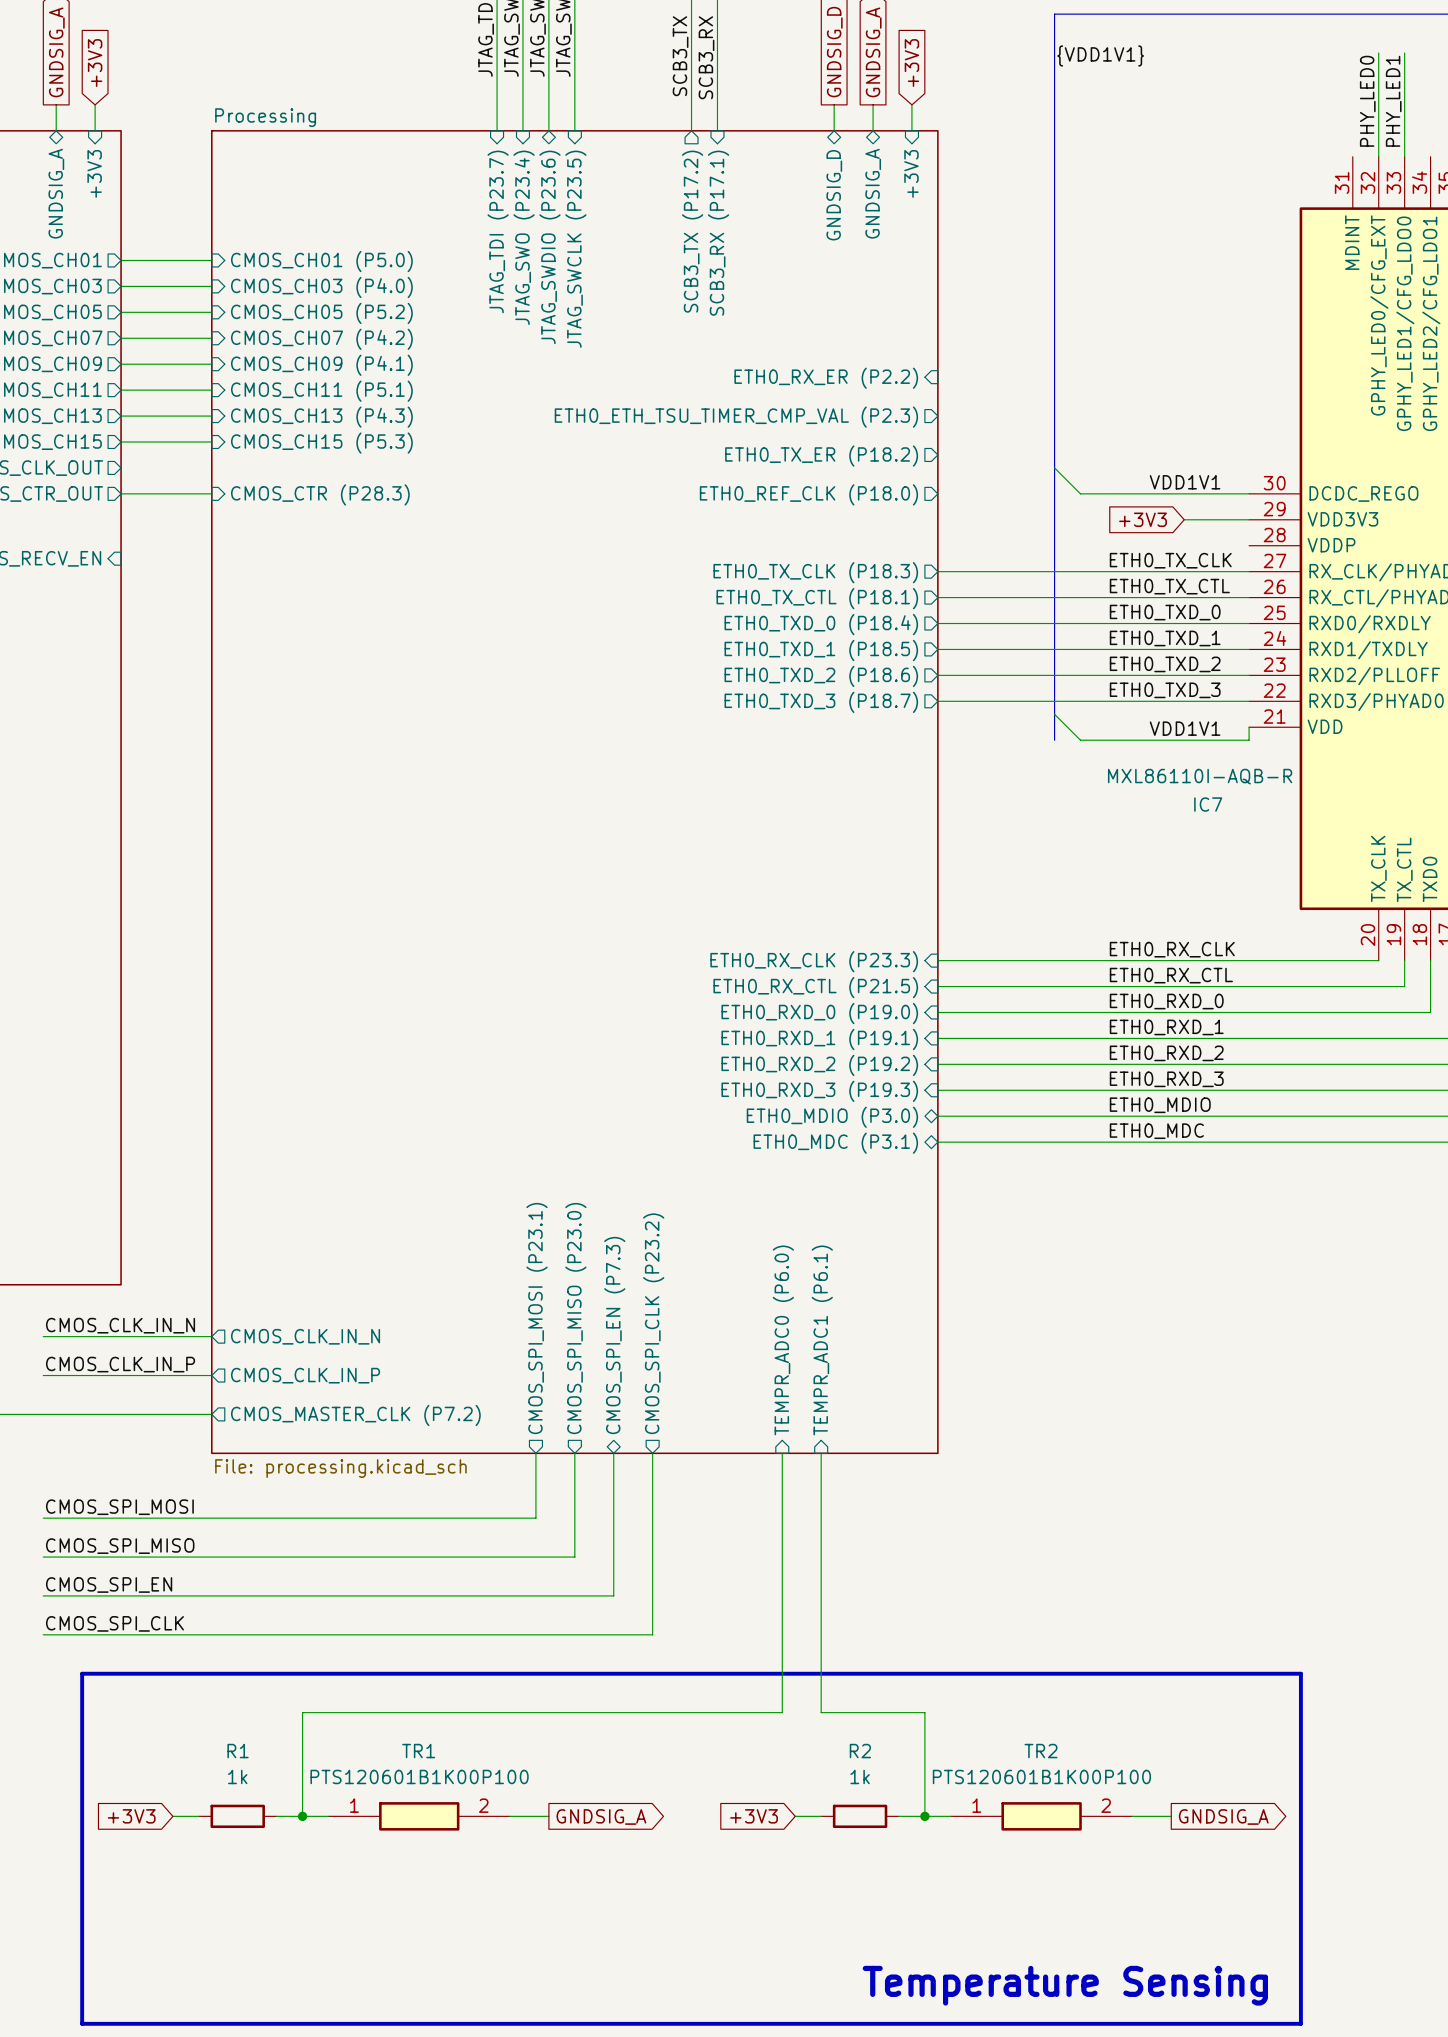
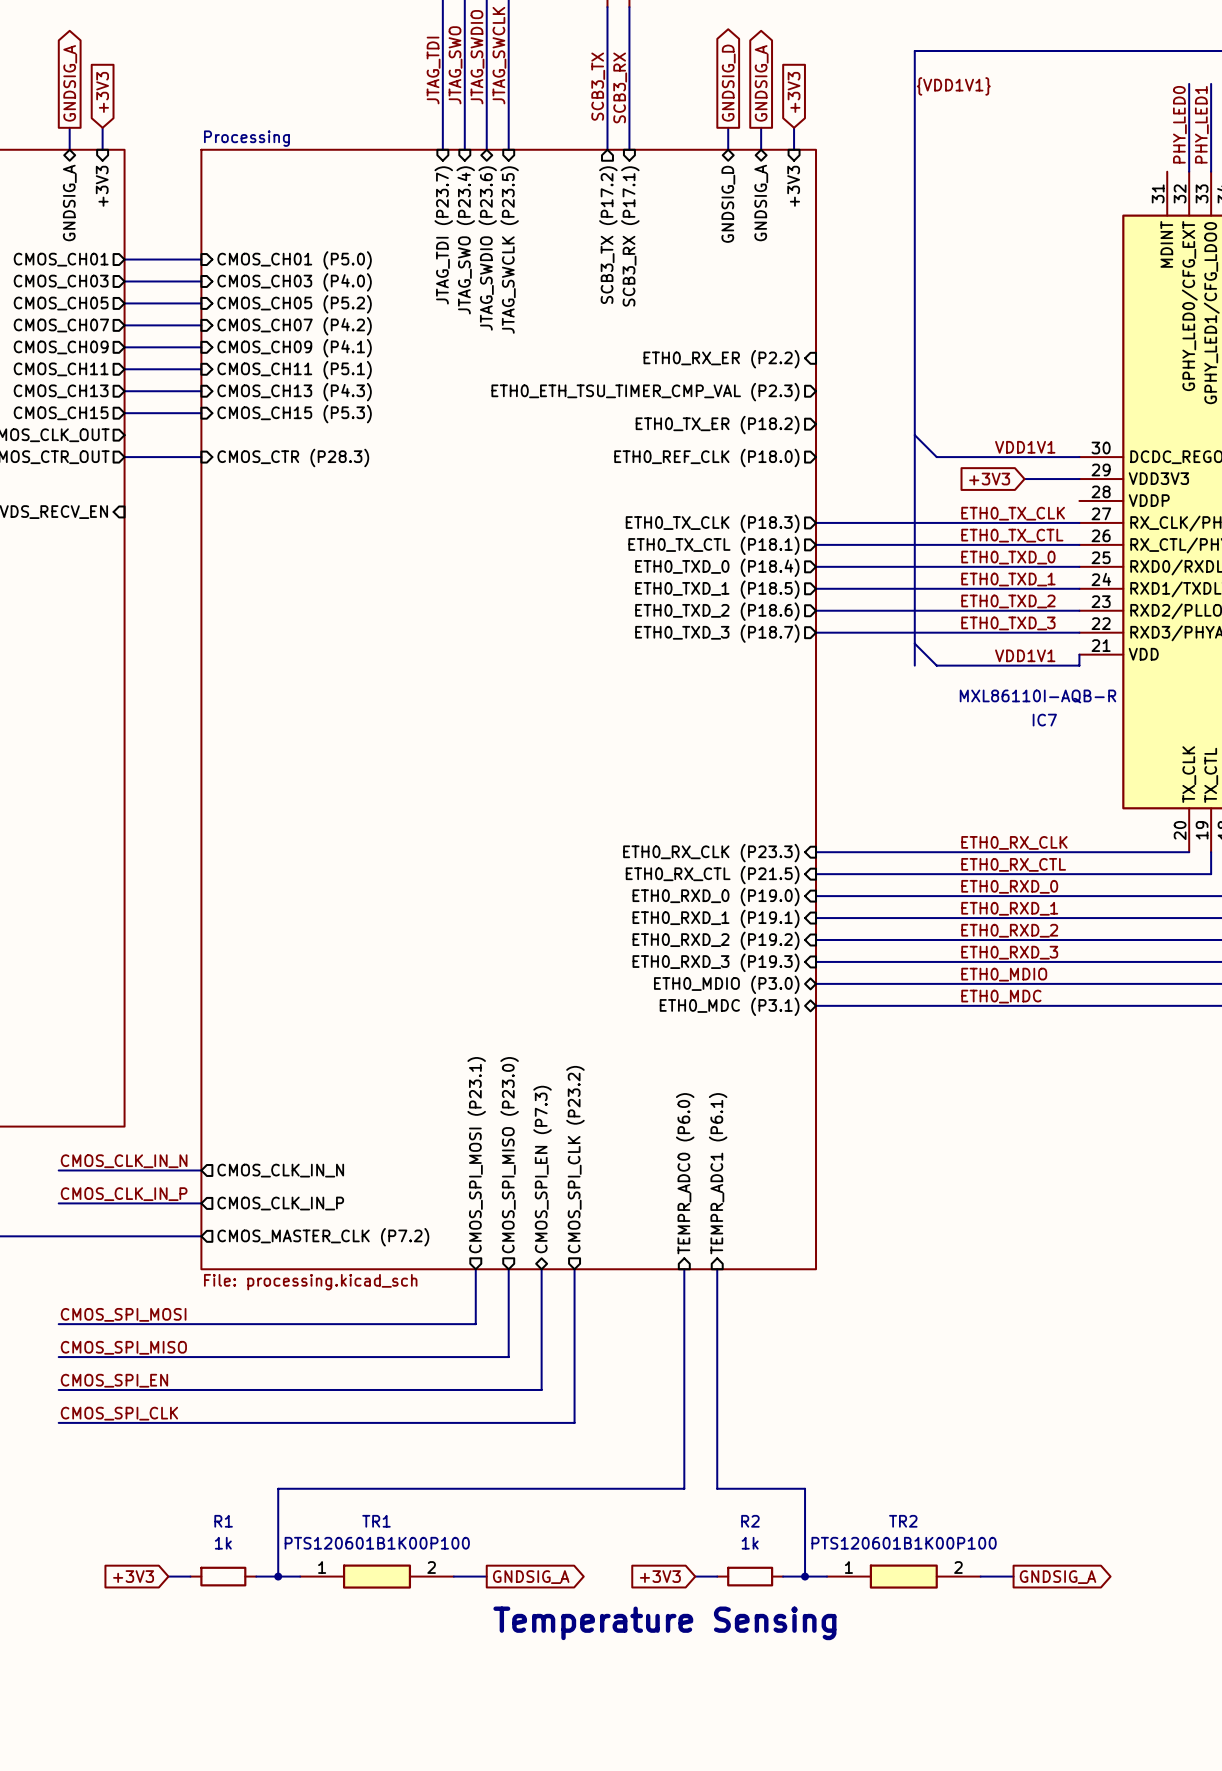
line: (82, 1673) (1300, 1673) (1300, 2023) (82, 2023) (82, 1673) -> none
text: none -> Temperature Sensing (664, 1623)
text: Temperature Sensing (1065, 1985) -> none

